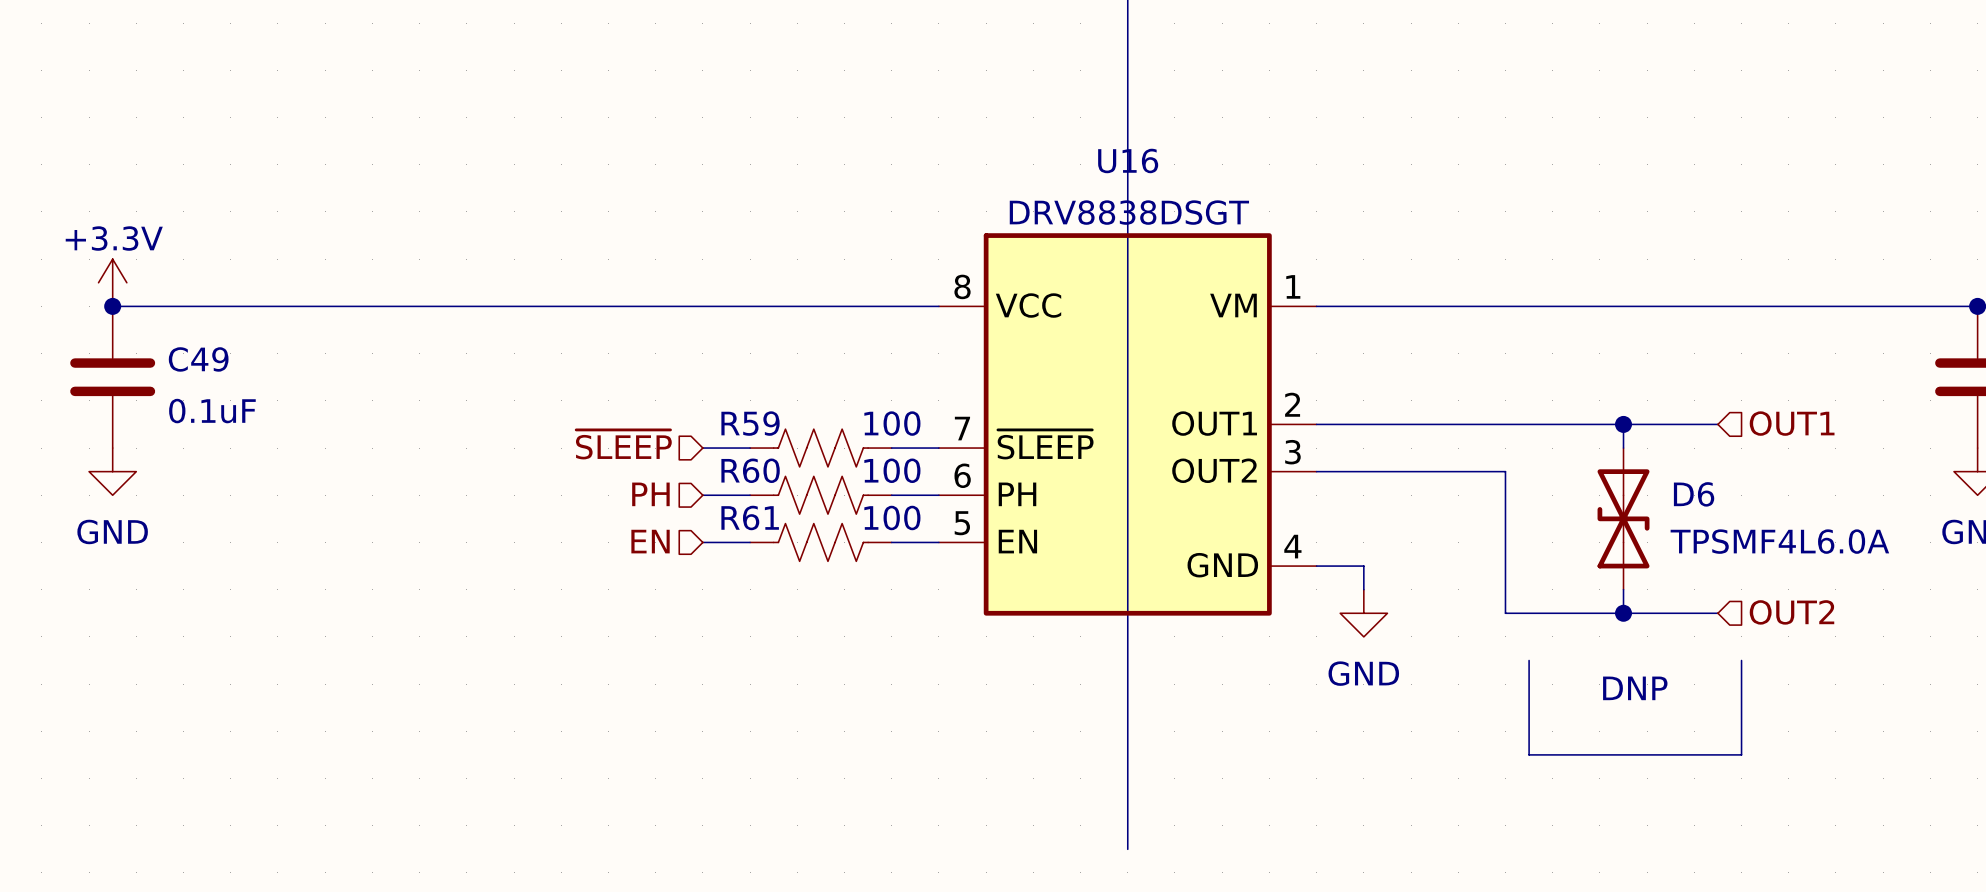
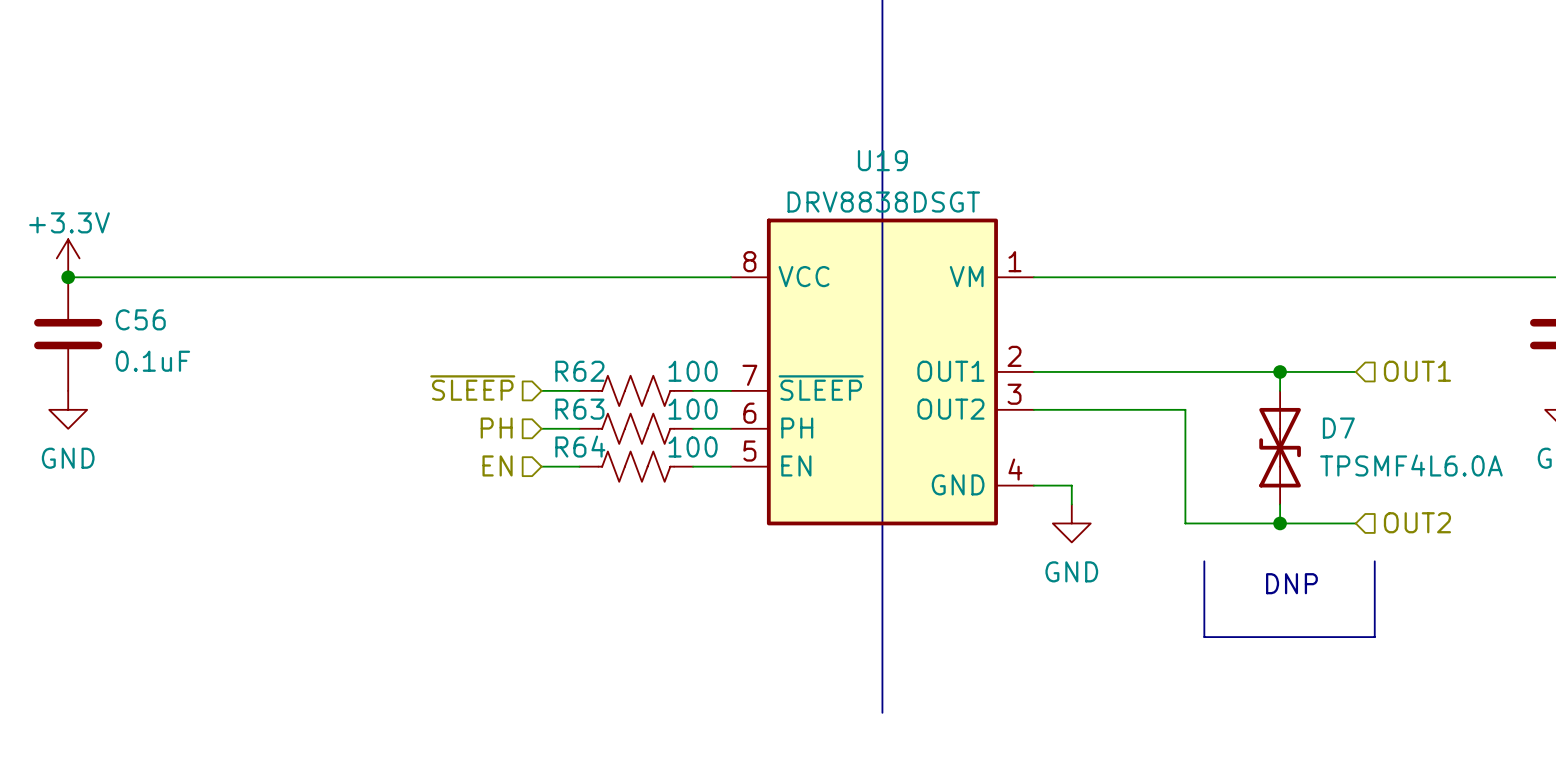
U16 name: U16 (1128, 160) -> U19 (882, 160)
C49 name: C49 (198, 359) -> C56 (140, 319)
R59 name: R59 (750, 423) -> R62 (579, 371)
R60 name: R60 (750, 470) -> R63 (579, 409)
D6 name: D6 (1694, 494) -> D7 (1338, 428)
R61 name: R61 (750, 517) -> R64 (580, 446)

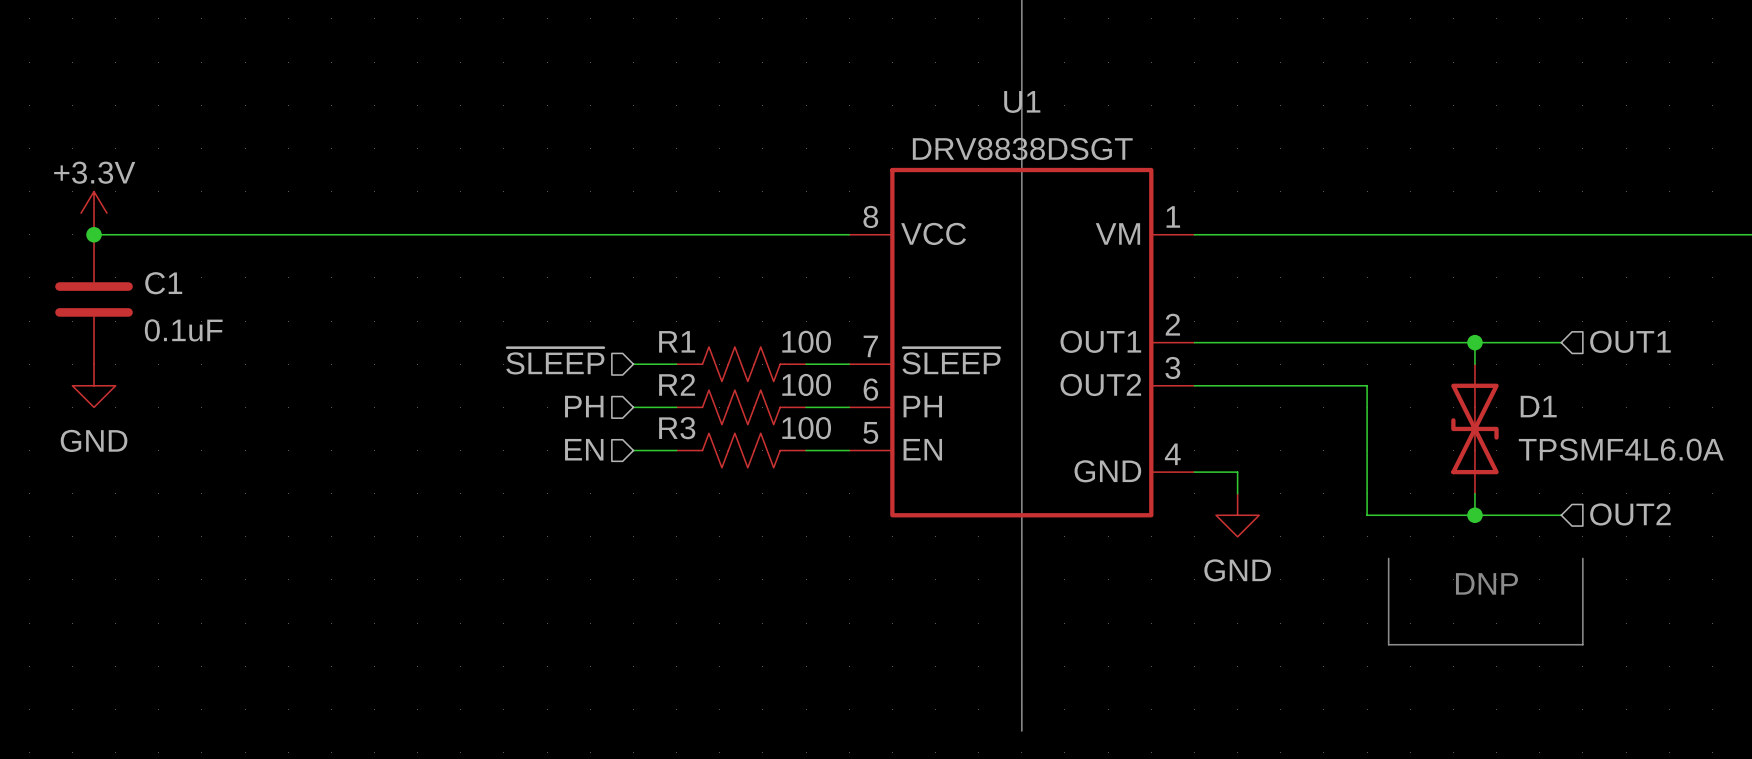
U19 name: U19 (882, 160) -> U1 (1022, 101)
C56 name: C56 (140, 319) -> C1 (163, 283)
R62 name: R62 (579, 371) -> R1 (677, 341)
R63 name: R63 (579, 409) -> R2 (677, 384)
D7 name: D7 (1338, 428) -> D1 (1538, 406)
R64 name: R64 (580, 446) -> R3 (677, 428)

